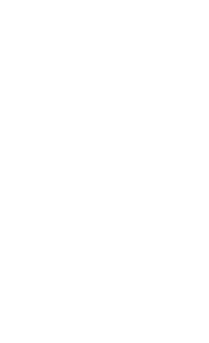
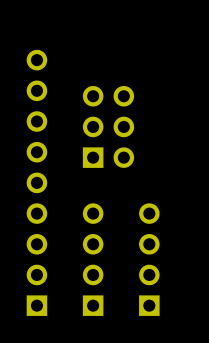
part: none -> (108, 126)
part: none -> (36, 182)
part: none -> (93, 259)
part: none -> (149, 259)

